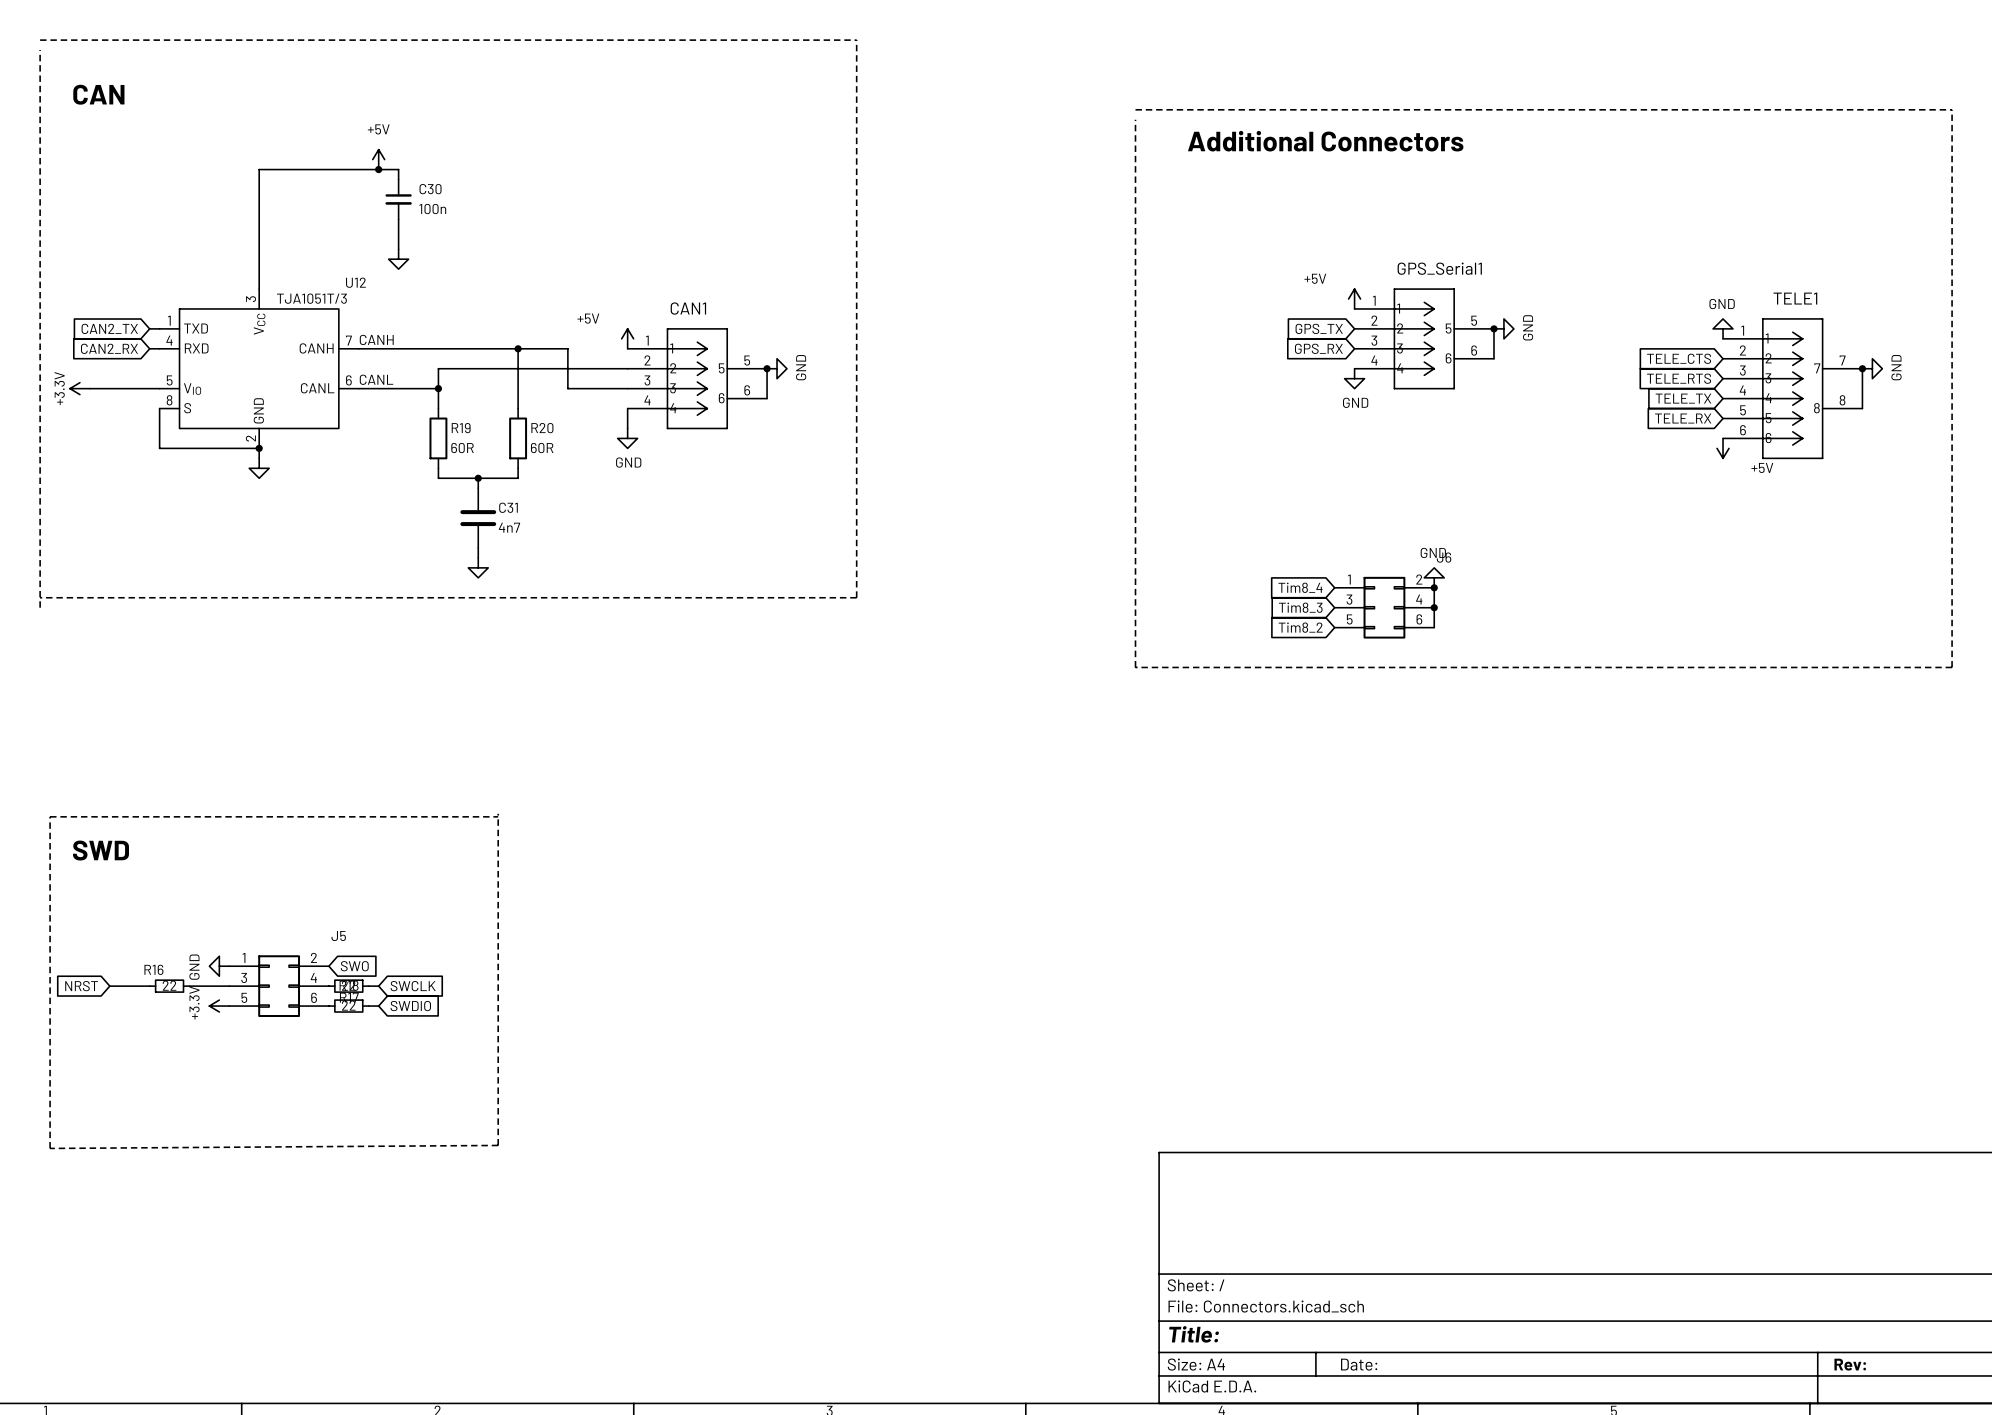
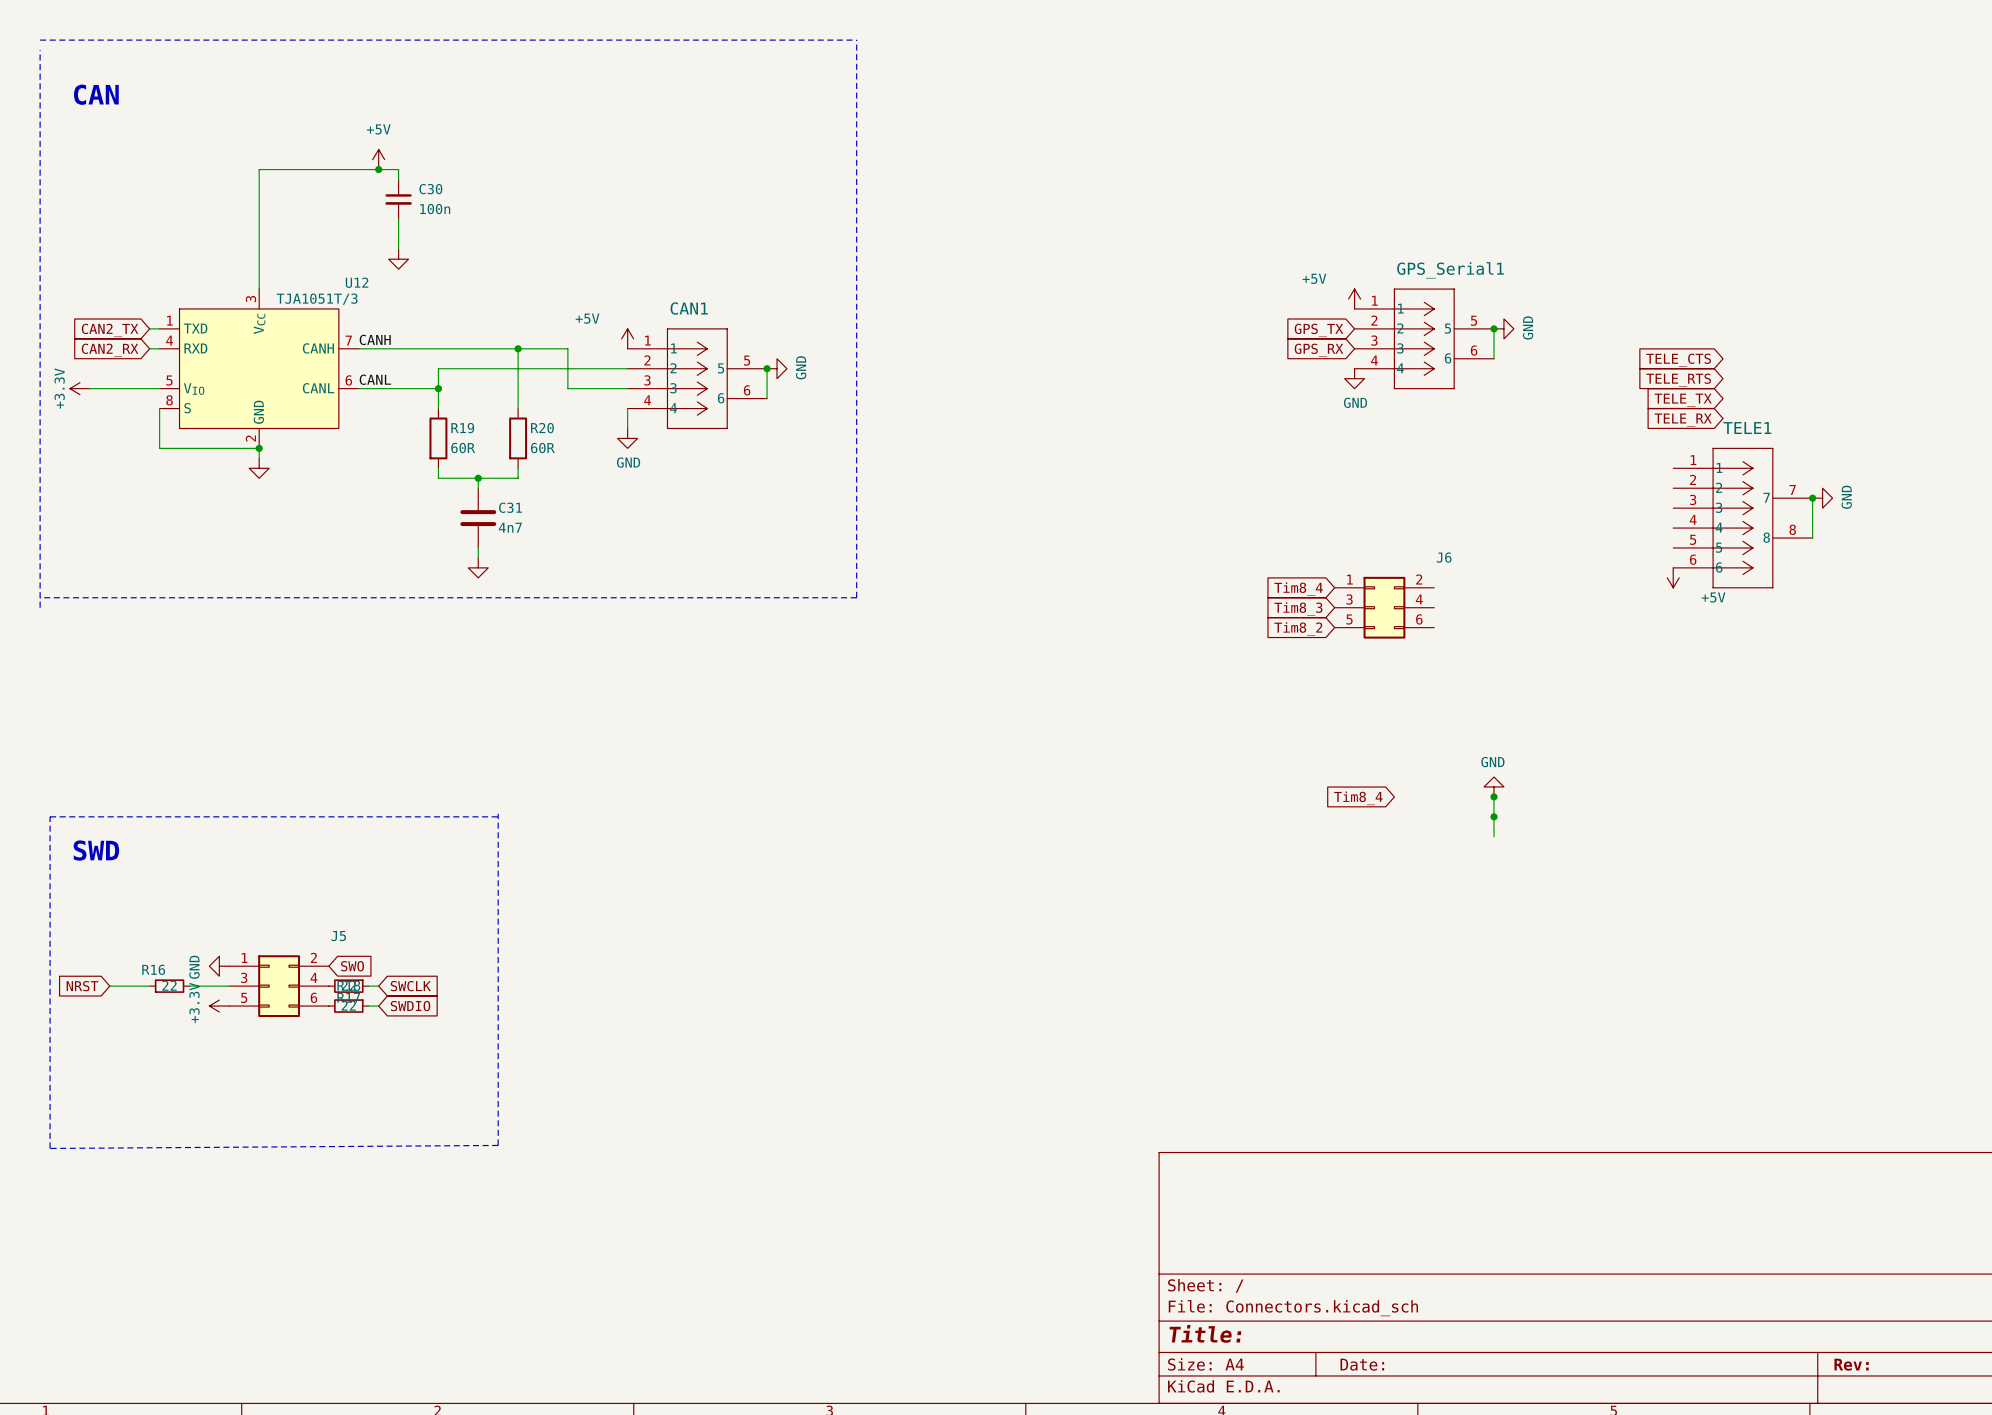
line: (1135, 109) (1952, 109) (1952, 667) (1135, 667) (1135, 119) -> none
text: Additional Connectors (1325, 141) -> none
power symbol: GND (1723, 328) -> none
wire: (1862, 368) (1862, 408) -> (1812, 498) (1812, 538)
junction: (1862, 368) -> none
power symbol: GND (1872, 368) -> none
TELE1 position: (1792, 388) -> (1742, 518)
power symbol position: +5V (1723, 448) -> +5V (1673, 577)
junction: none -> (1812, 498)
power symbol: none -> GND (1822, 498)
power symbol: GND (1434, 577) -> none
wire: (1434, 587) (1434, 627) -> none
junction: (1434, 587) -> none
junction: (1434, 607) -> none
power symbol: none -> GND (1493, 786)
global label: none -> Tim8_4 (1358, 798)
wire: none -> (1493, 796) (1493, 836)
junction: none -> (1493, 796)
junction: none -> (1493, 816)

